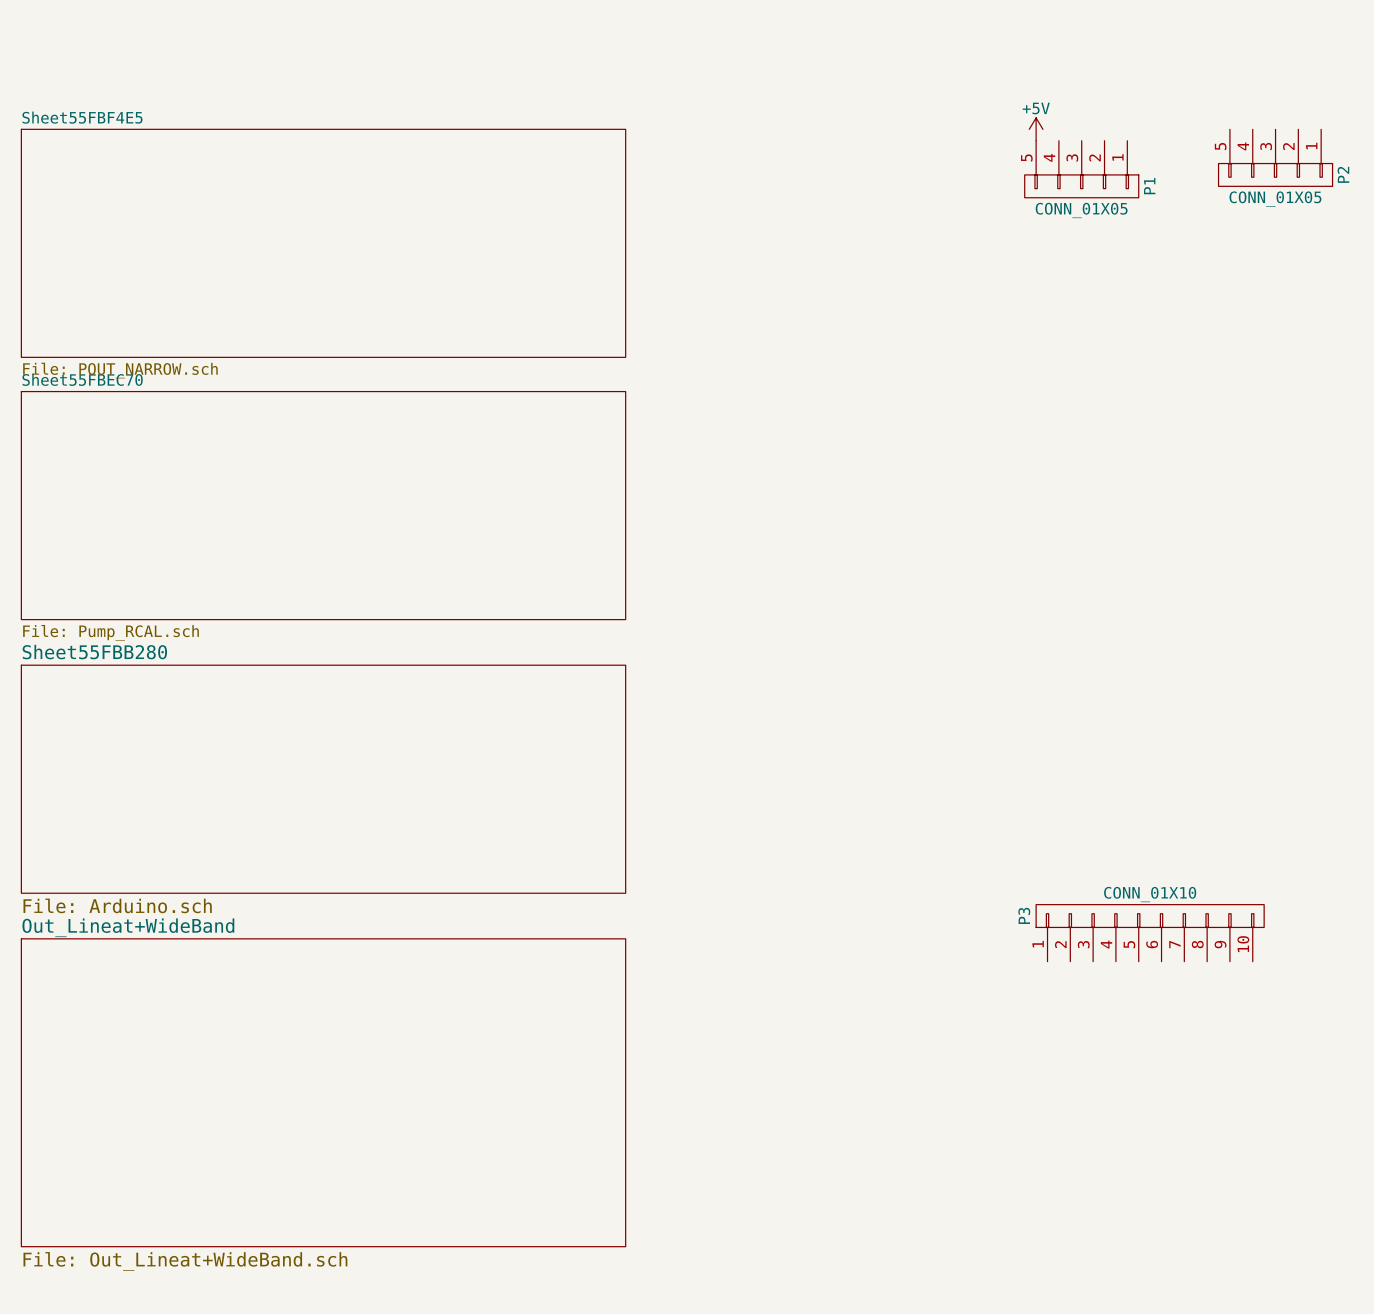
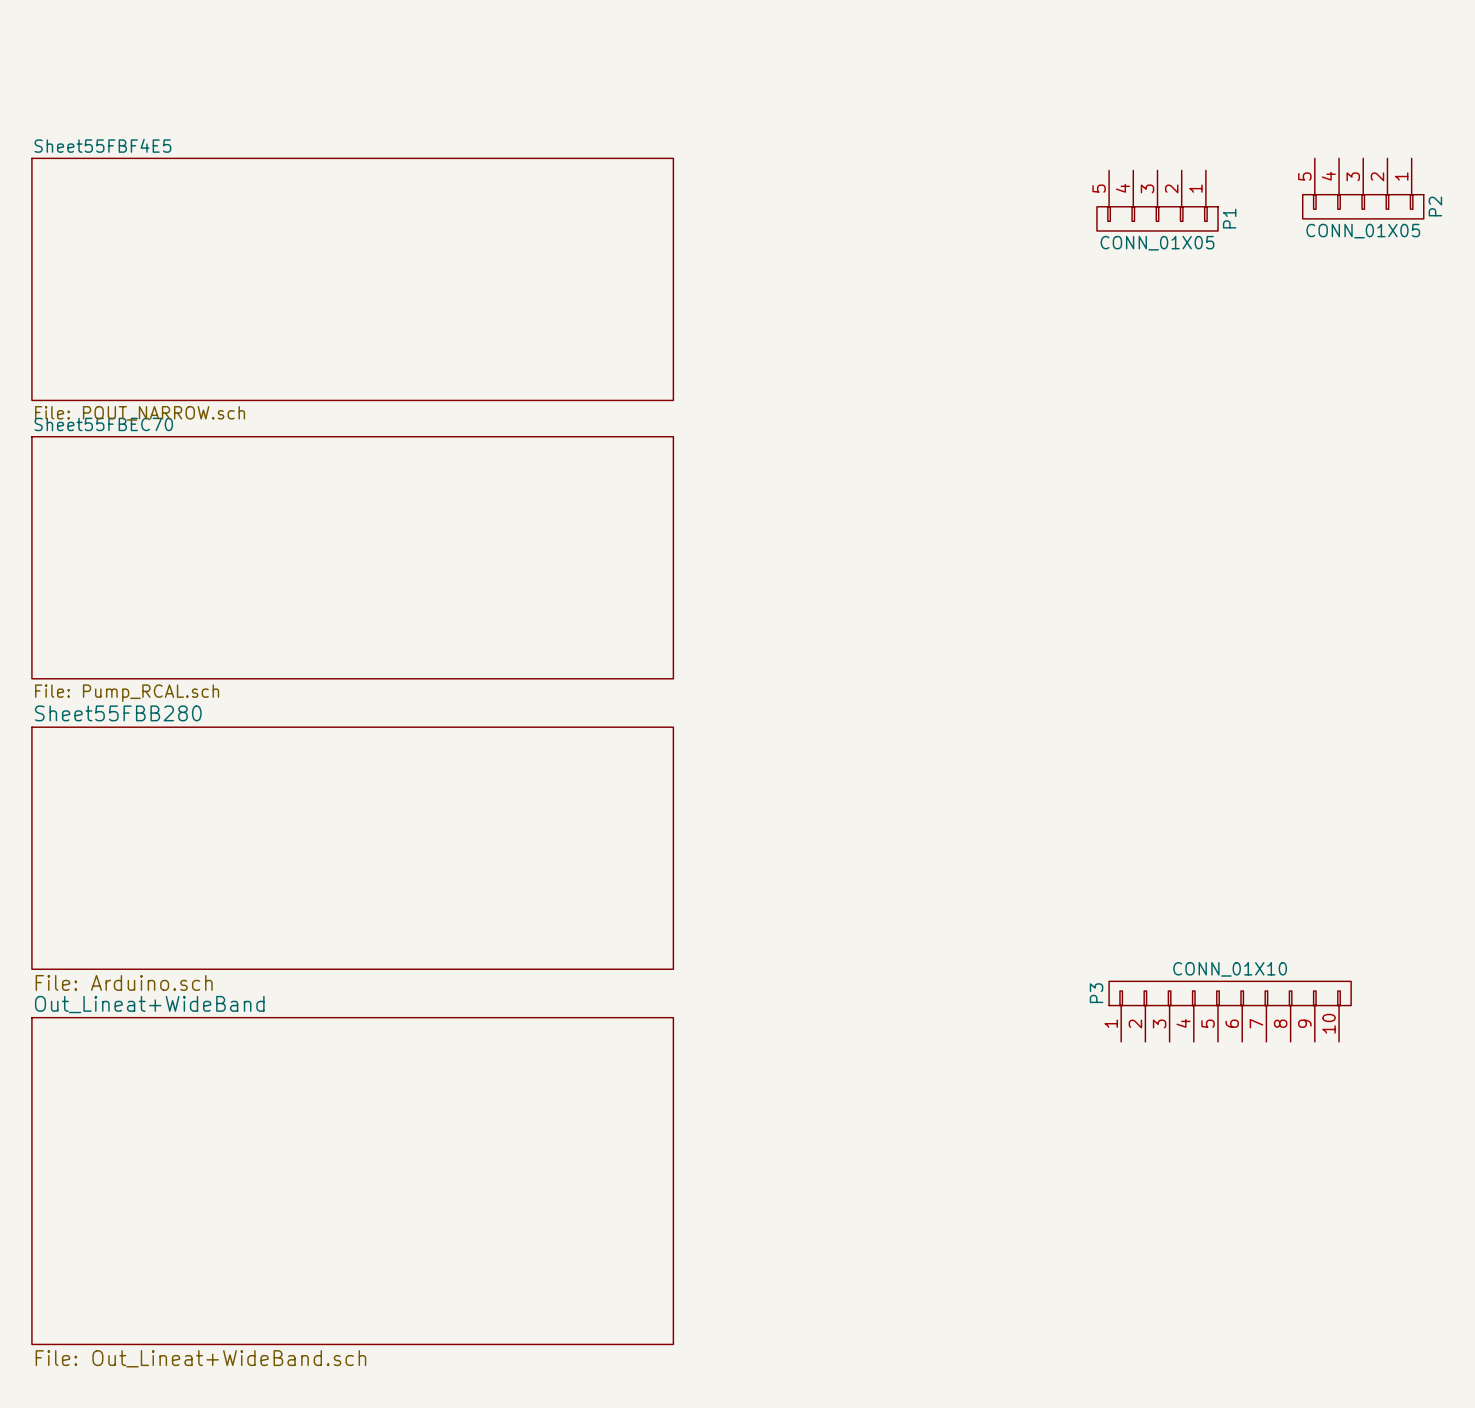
power symbol: +5V (1036, 129) -> none

